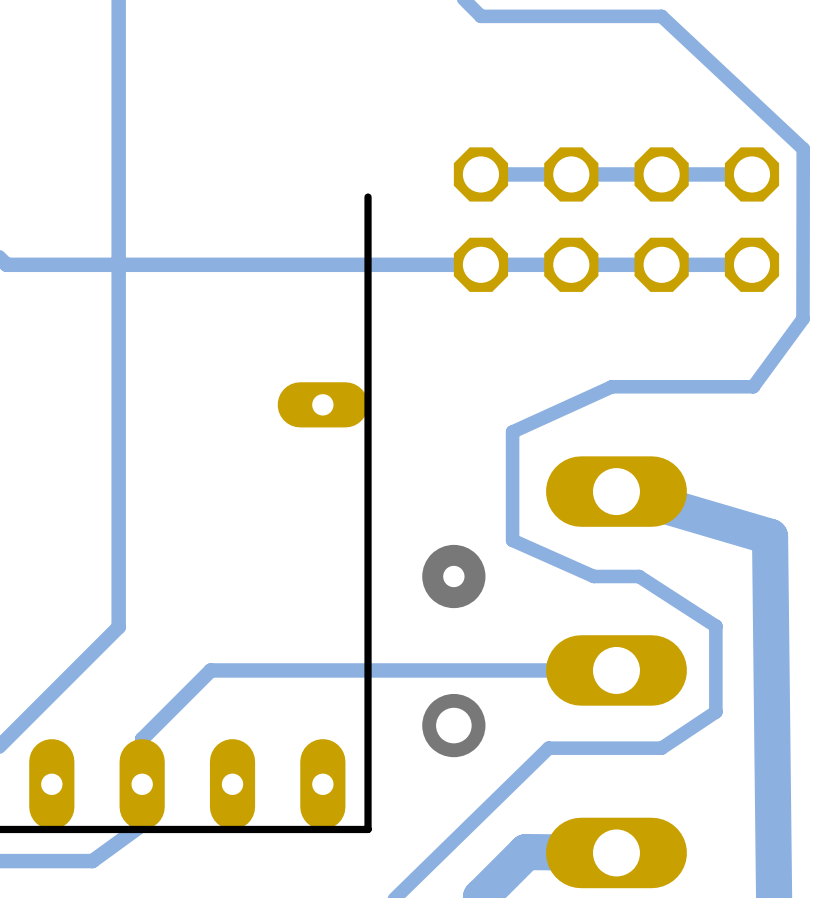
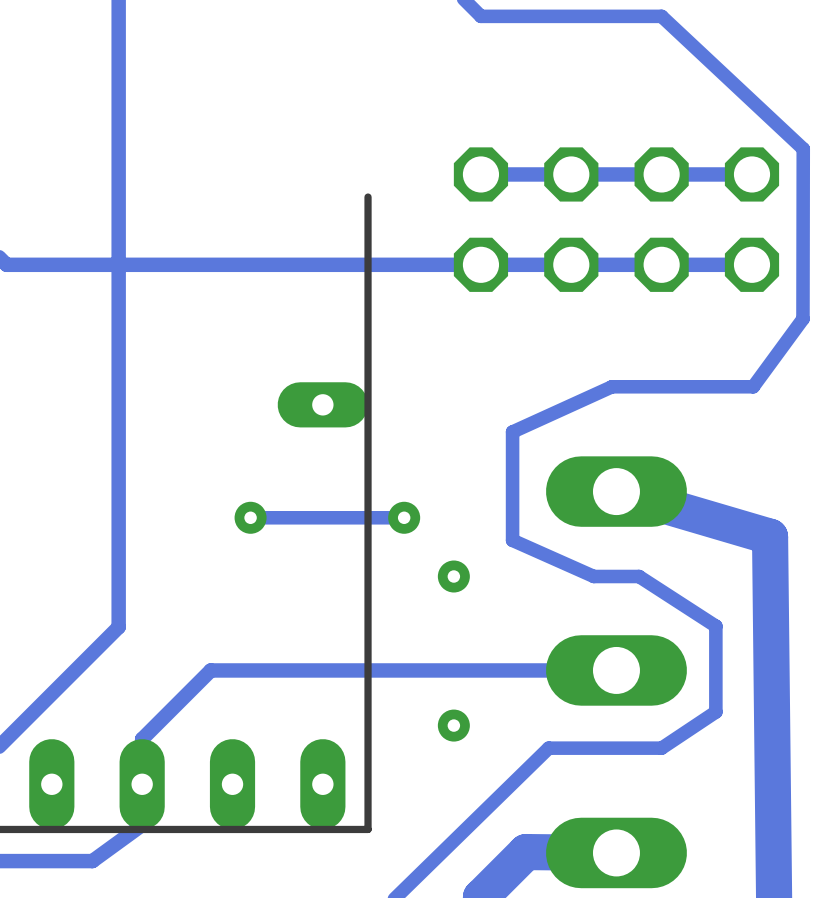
via: none -> (250, 517)
track: none -> (404, 517) (250, 517)
via: none -> (404, 517)
via size: [422, 544, 486, 609] -> [437, 560, 470, 593]
via size: [422, 693, 486, 758] -> [437, 709, 470, 742]

